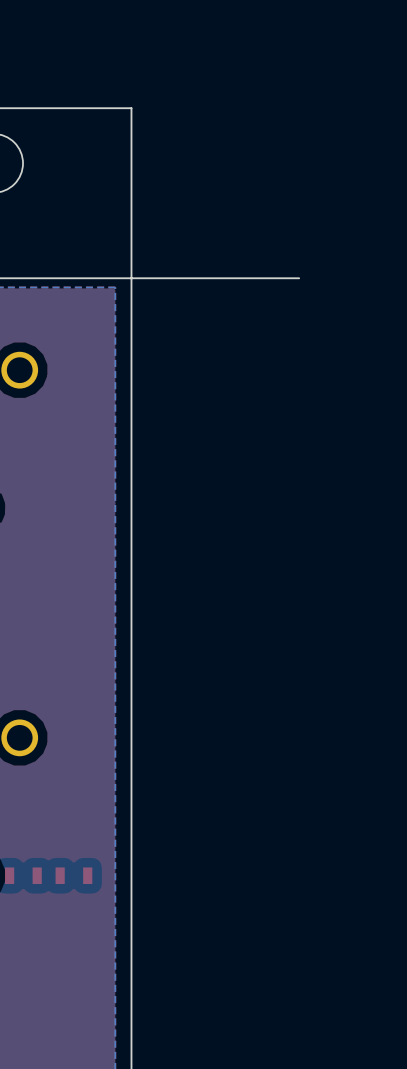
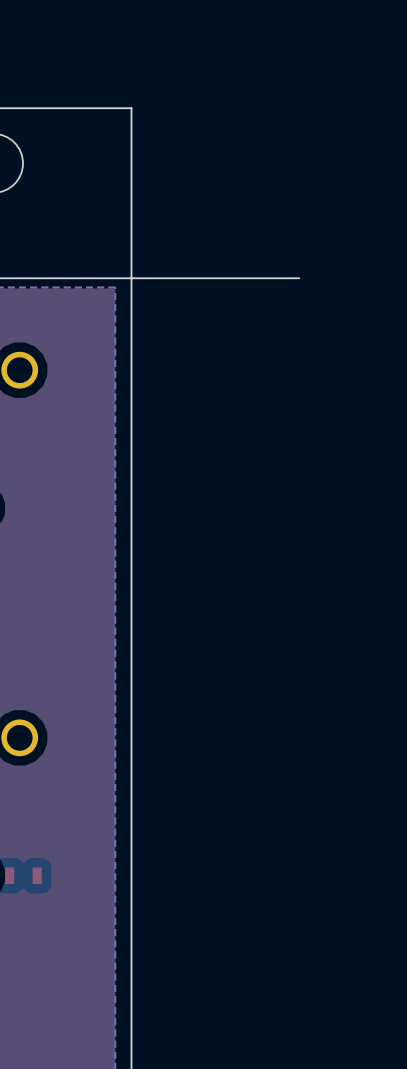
part: (73, 875) -> none

